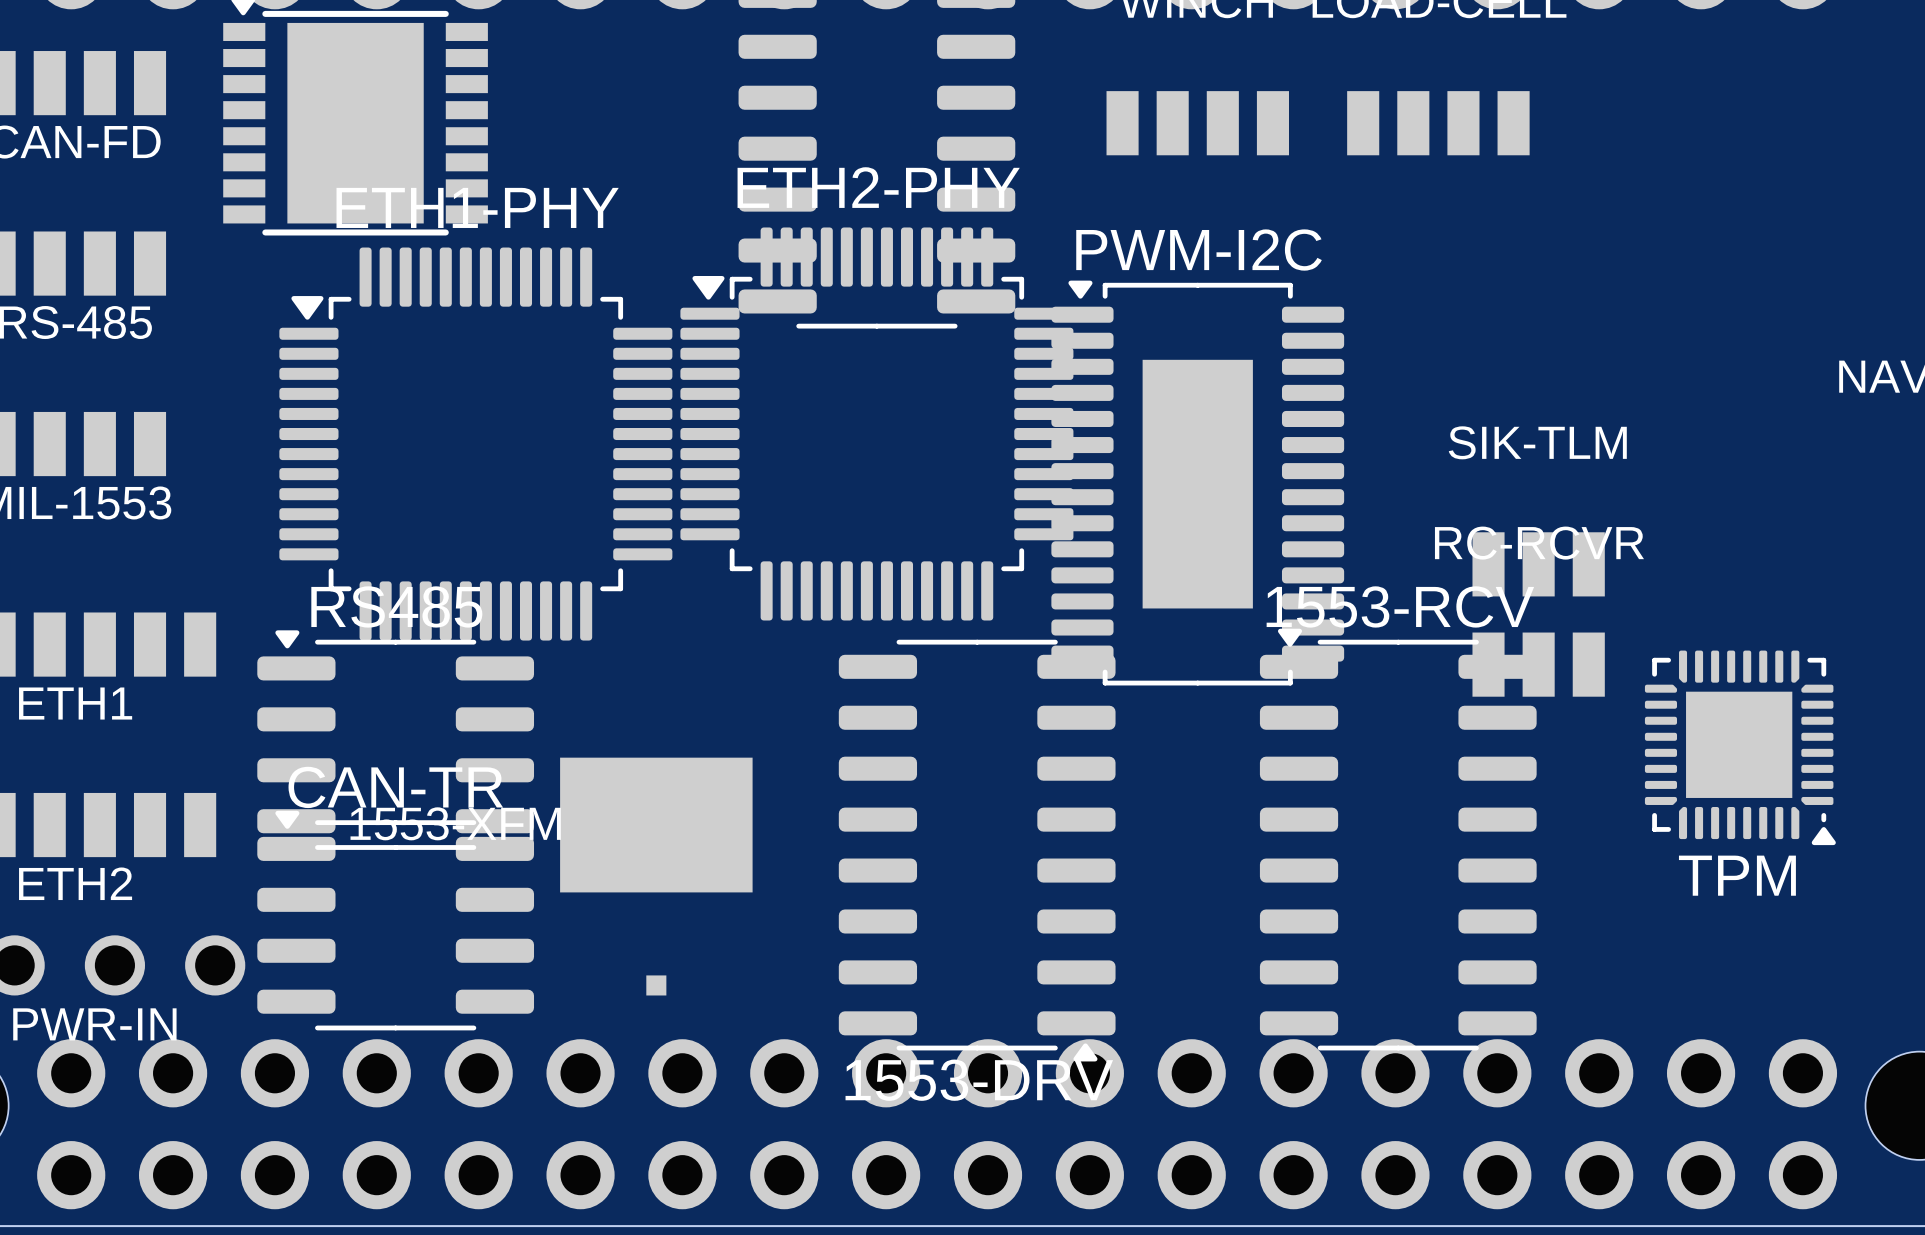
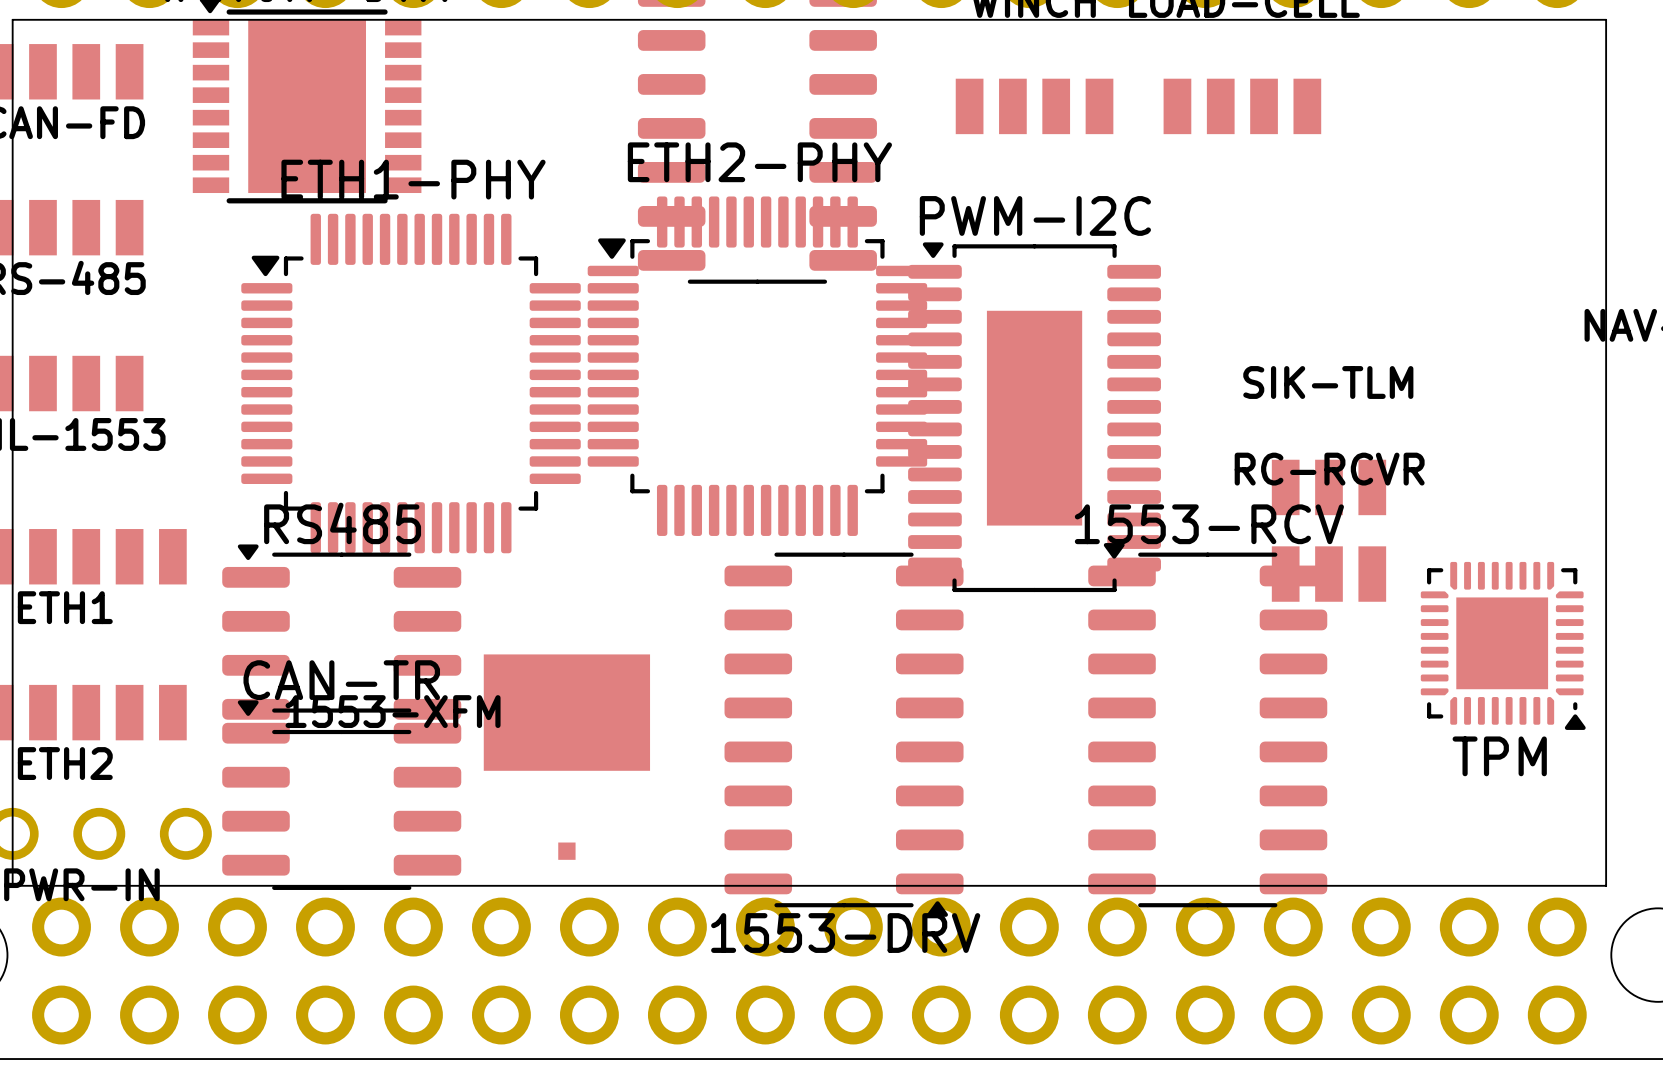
line: none -> (12, 19) (1606, 19) (1606, 885) (12, 885) (12, 19)

